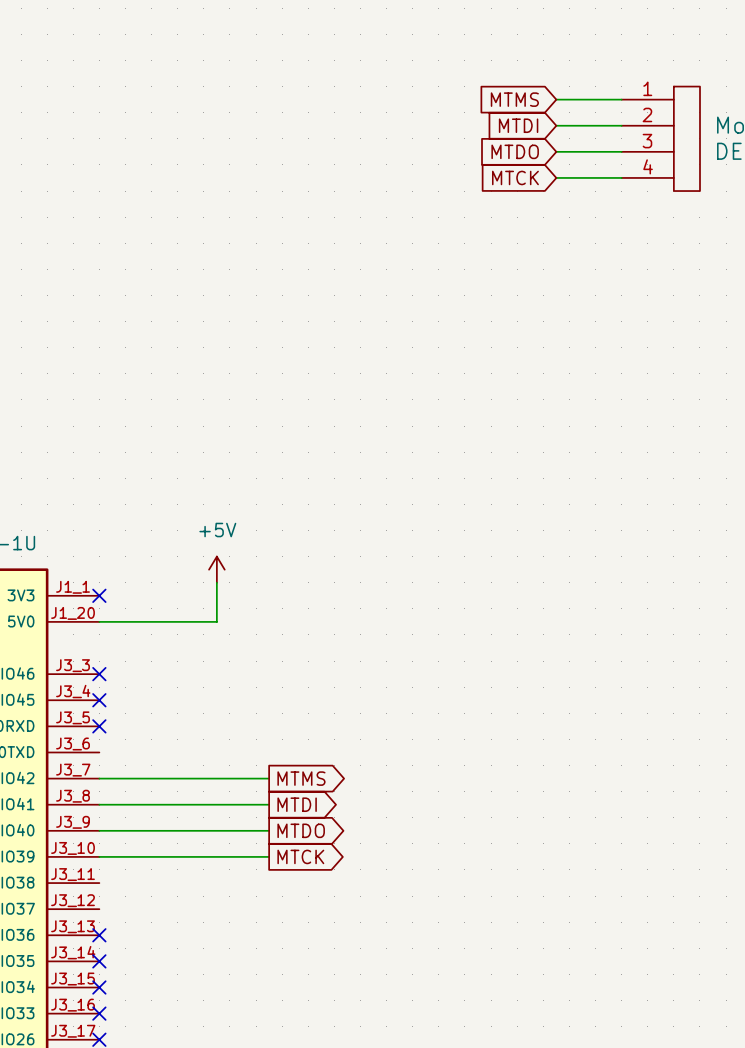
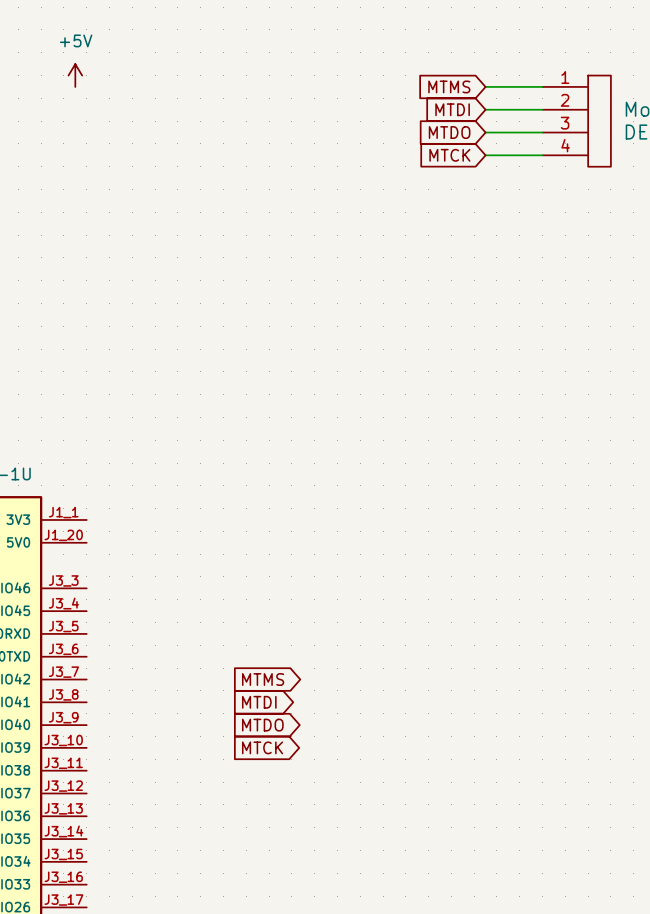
power symbol: none -> +5V (75, 75)
power symbol: +5V (216, 569) -> none
wire: (216, 582) (216, 621) (99, 621) -> none
no-connect mark: (99, 595) -> none
no-connect mark: (99, 674) -> none
no-connect mark: (99, 700) -> none
no-connect mark: (99, 726) -> none
wire: (99, 778) (269, 778) -> none
wire: (99, 804) (269, 804) -> none
wire: (99, 830) (269, 830) -> none
wire: (99, 856) (269, 856) -> none
no-connect mark: (99, 935) -> none
no-connect mark: (99, 961) -> none
no-connect mark: (99, 987) -> none
no-connect mark: (99, 1013) -> none
no-connect mark: (99, 1039) -> none

